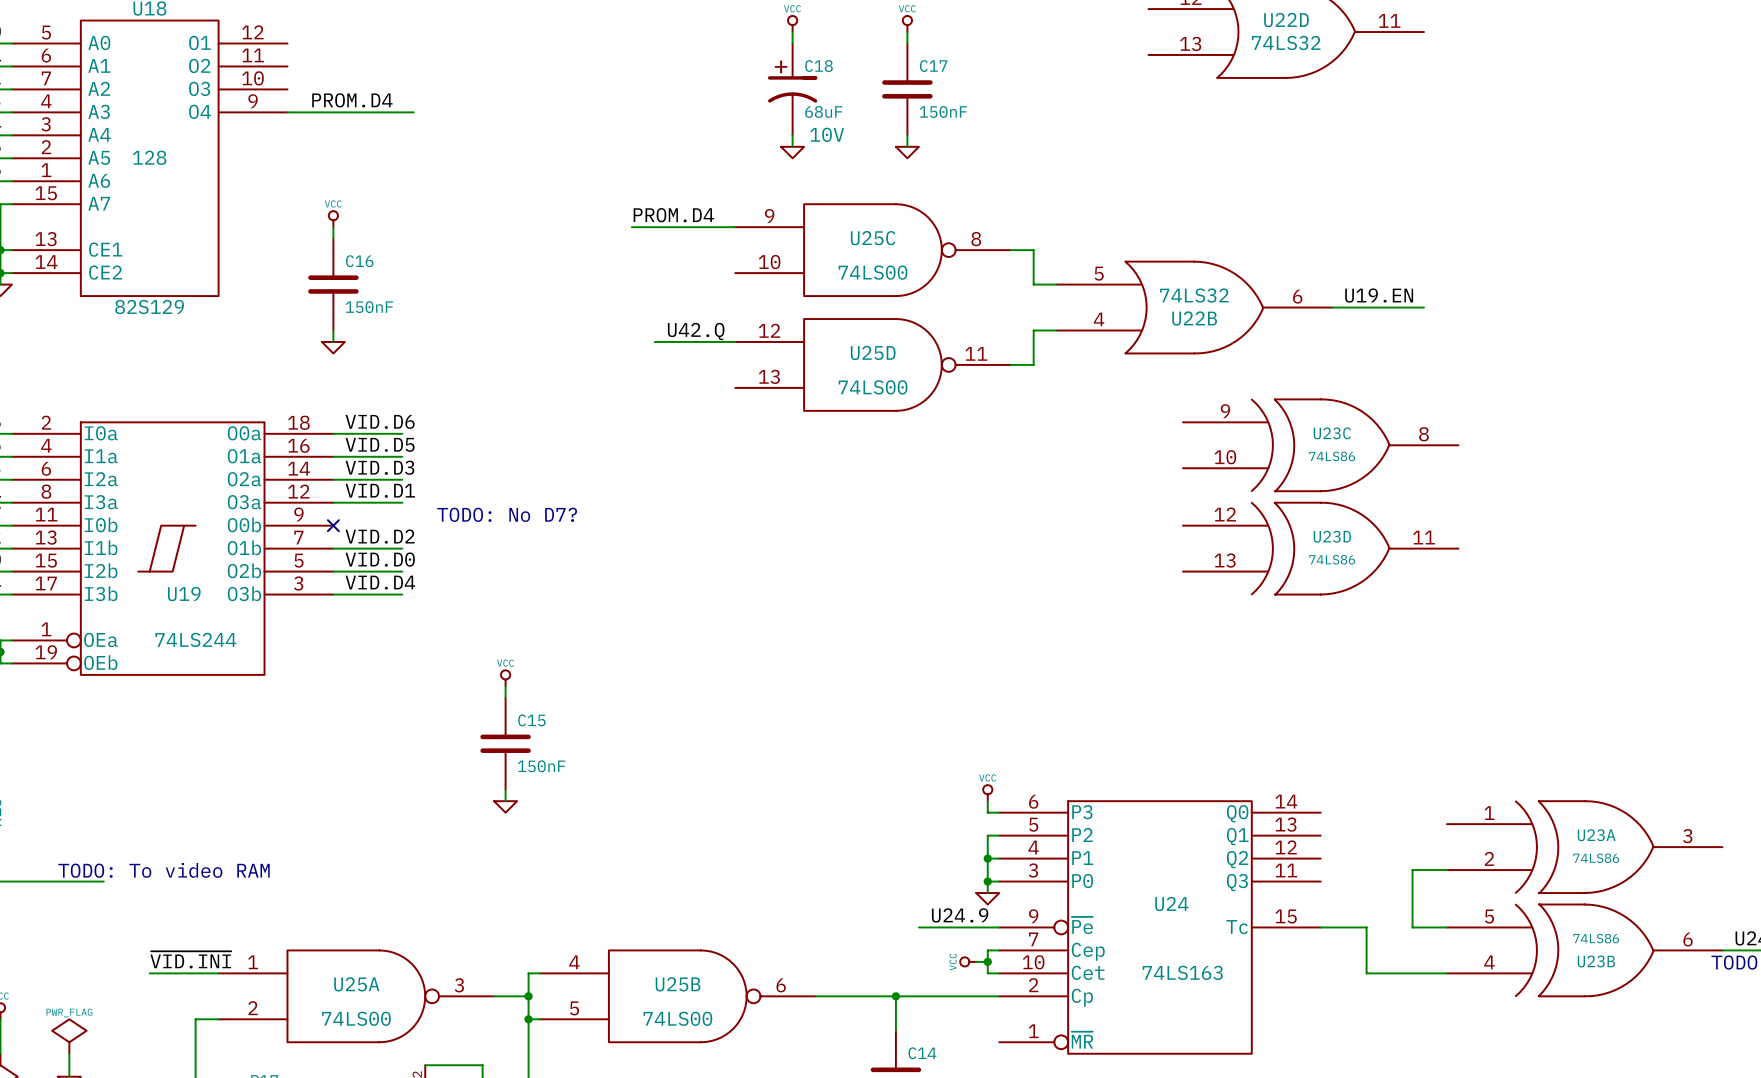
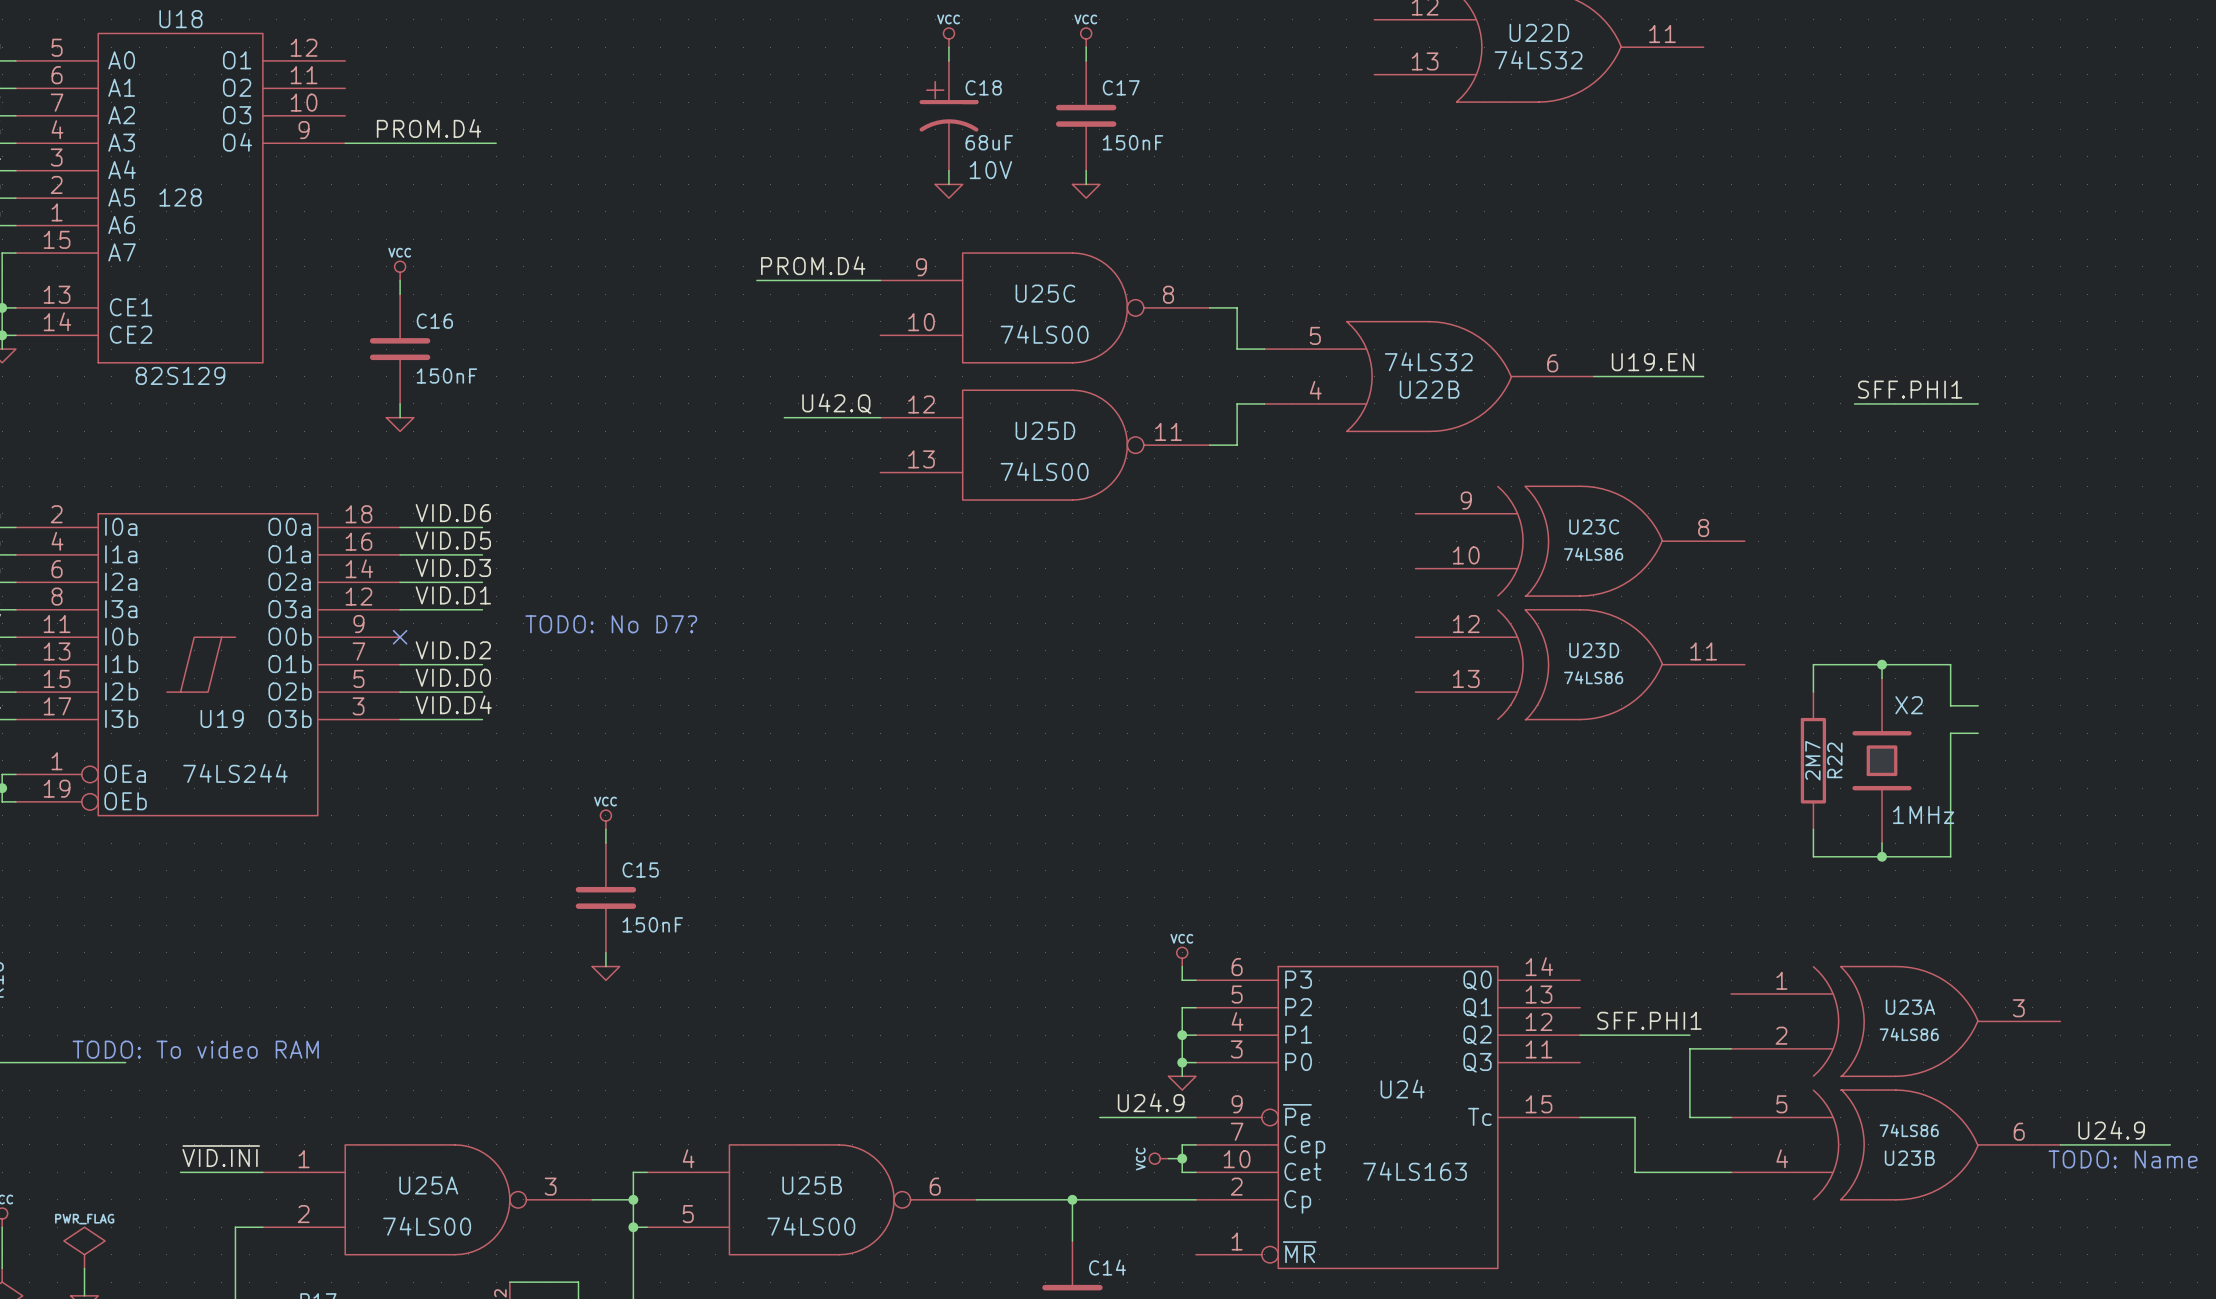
label: none -> SFF.PHI1 (1910, 389)
wire: none -> (1854, 403) (1978, 403)
wire: none -> (1882, 664) (1882, 678)
junction: none -> (1882, 664)
wire: none -> (1813, 692) (1813, 664) (1950, 664) (1950, 705) (1978, 705)
wire: none -> (1978, 733) (1950, 733) (1950, 856) (1813, 856) (1813, 829)
R22: none -> 2M7 (1813, 760)
X2: none -> 1MHz (1882, 760)
wire: none -> (1882, 843) (1882, 856)
junction: none -> (1882, 856)
label: none -> SFF.PHI1 (1649, 1020)
wire: none -> (1580, 1035) (1689, 1035)

